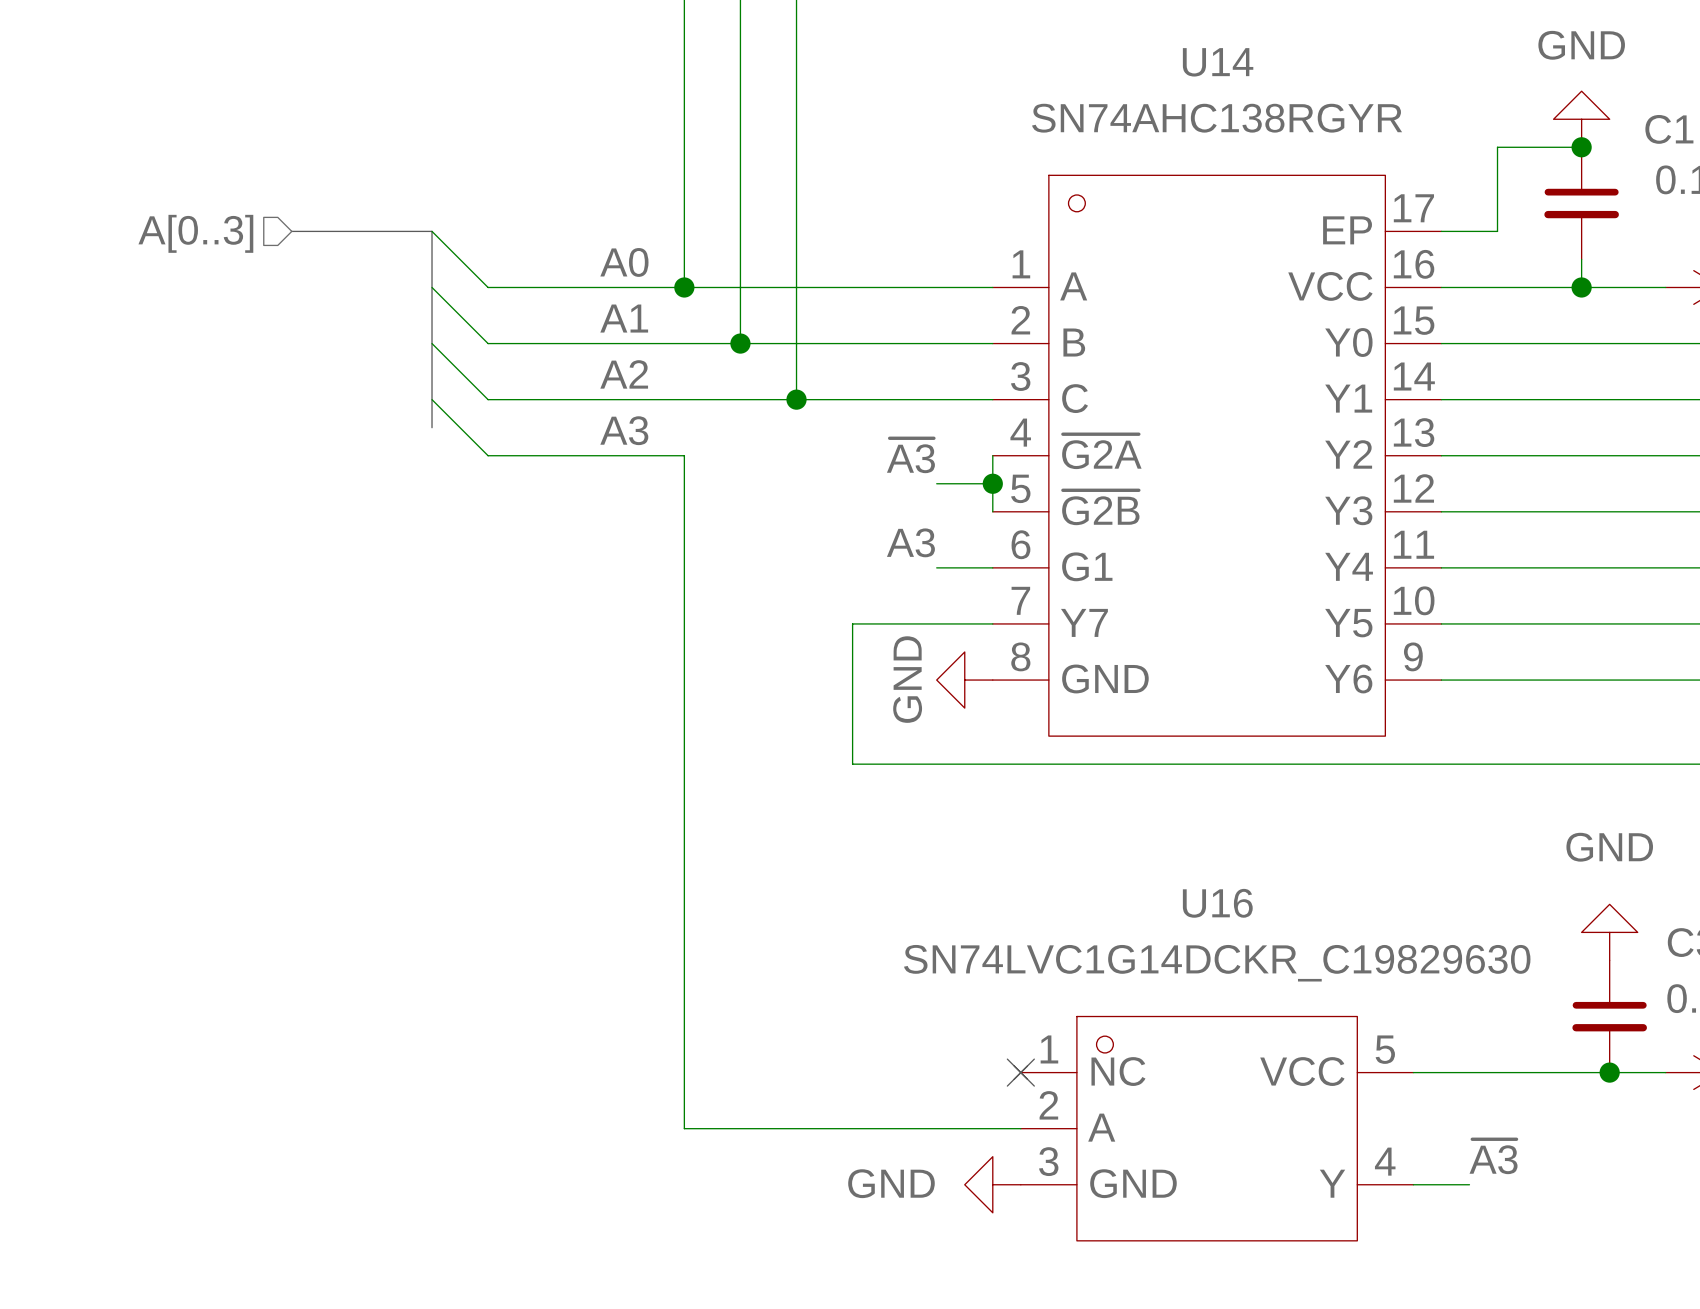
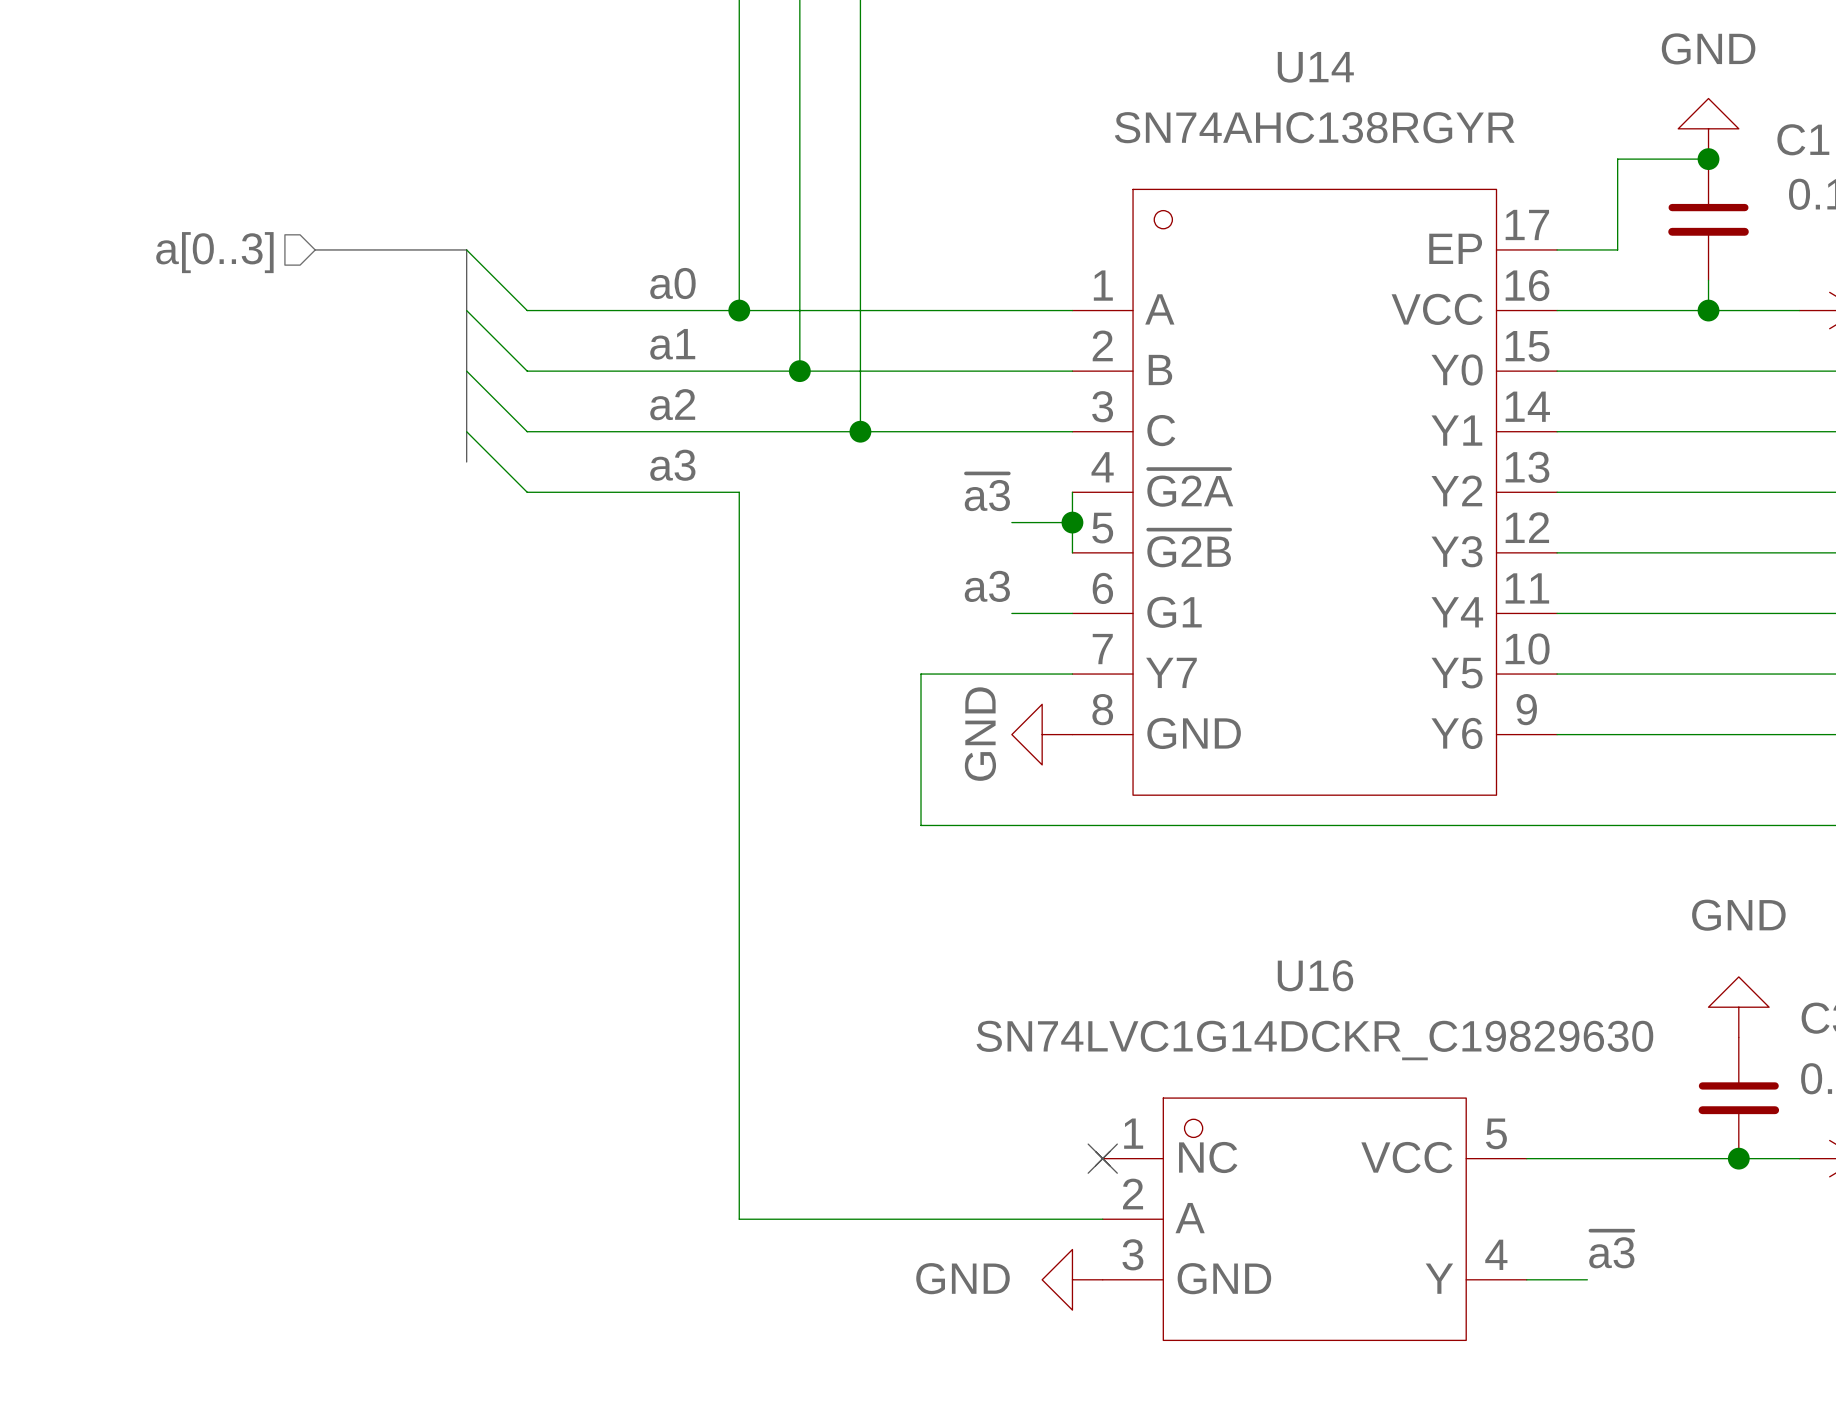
hierarchical label: A[0..3] (195, 233) -> a[0..3] (214, 252)
label: A0 (624, 262) -> a0 (672, 283)
label: A1 (624, 318) -> a1 (672, 344)
label: A2 (624, 374) -> a2 (672, 404)
label: A3 (624, 430) -> a3 (672, 465)
label: ~{A3} (910, 455) -> ~{a3} (987, 492)
label: A3 (910, 542) -> a3 (987, 586)
label: ~{A3} (1493, 1156) -> ~{a3} (1611, 1249)

